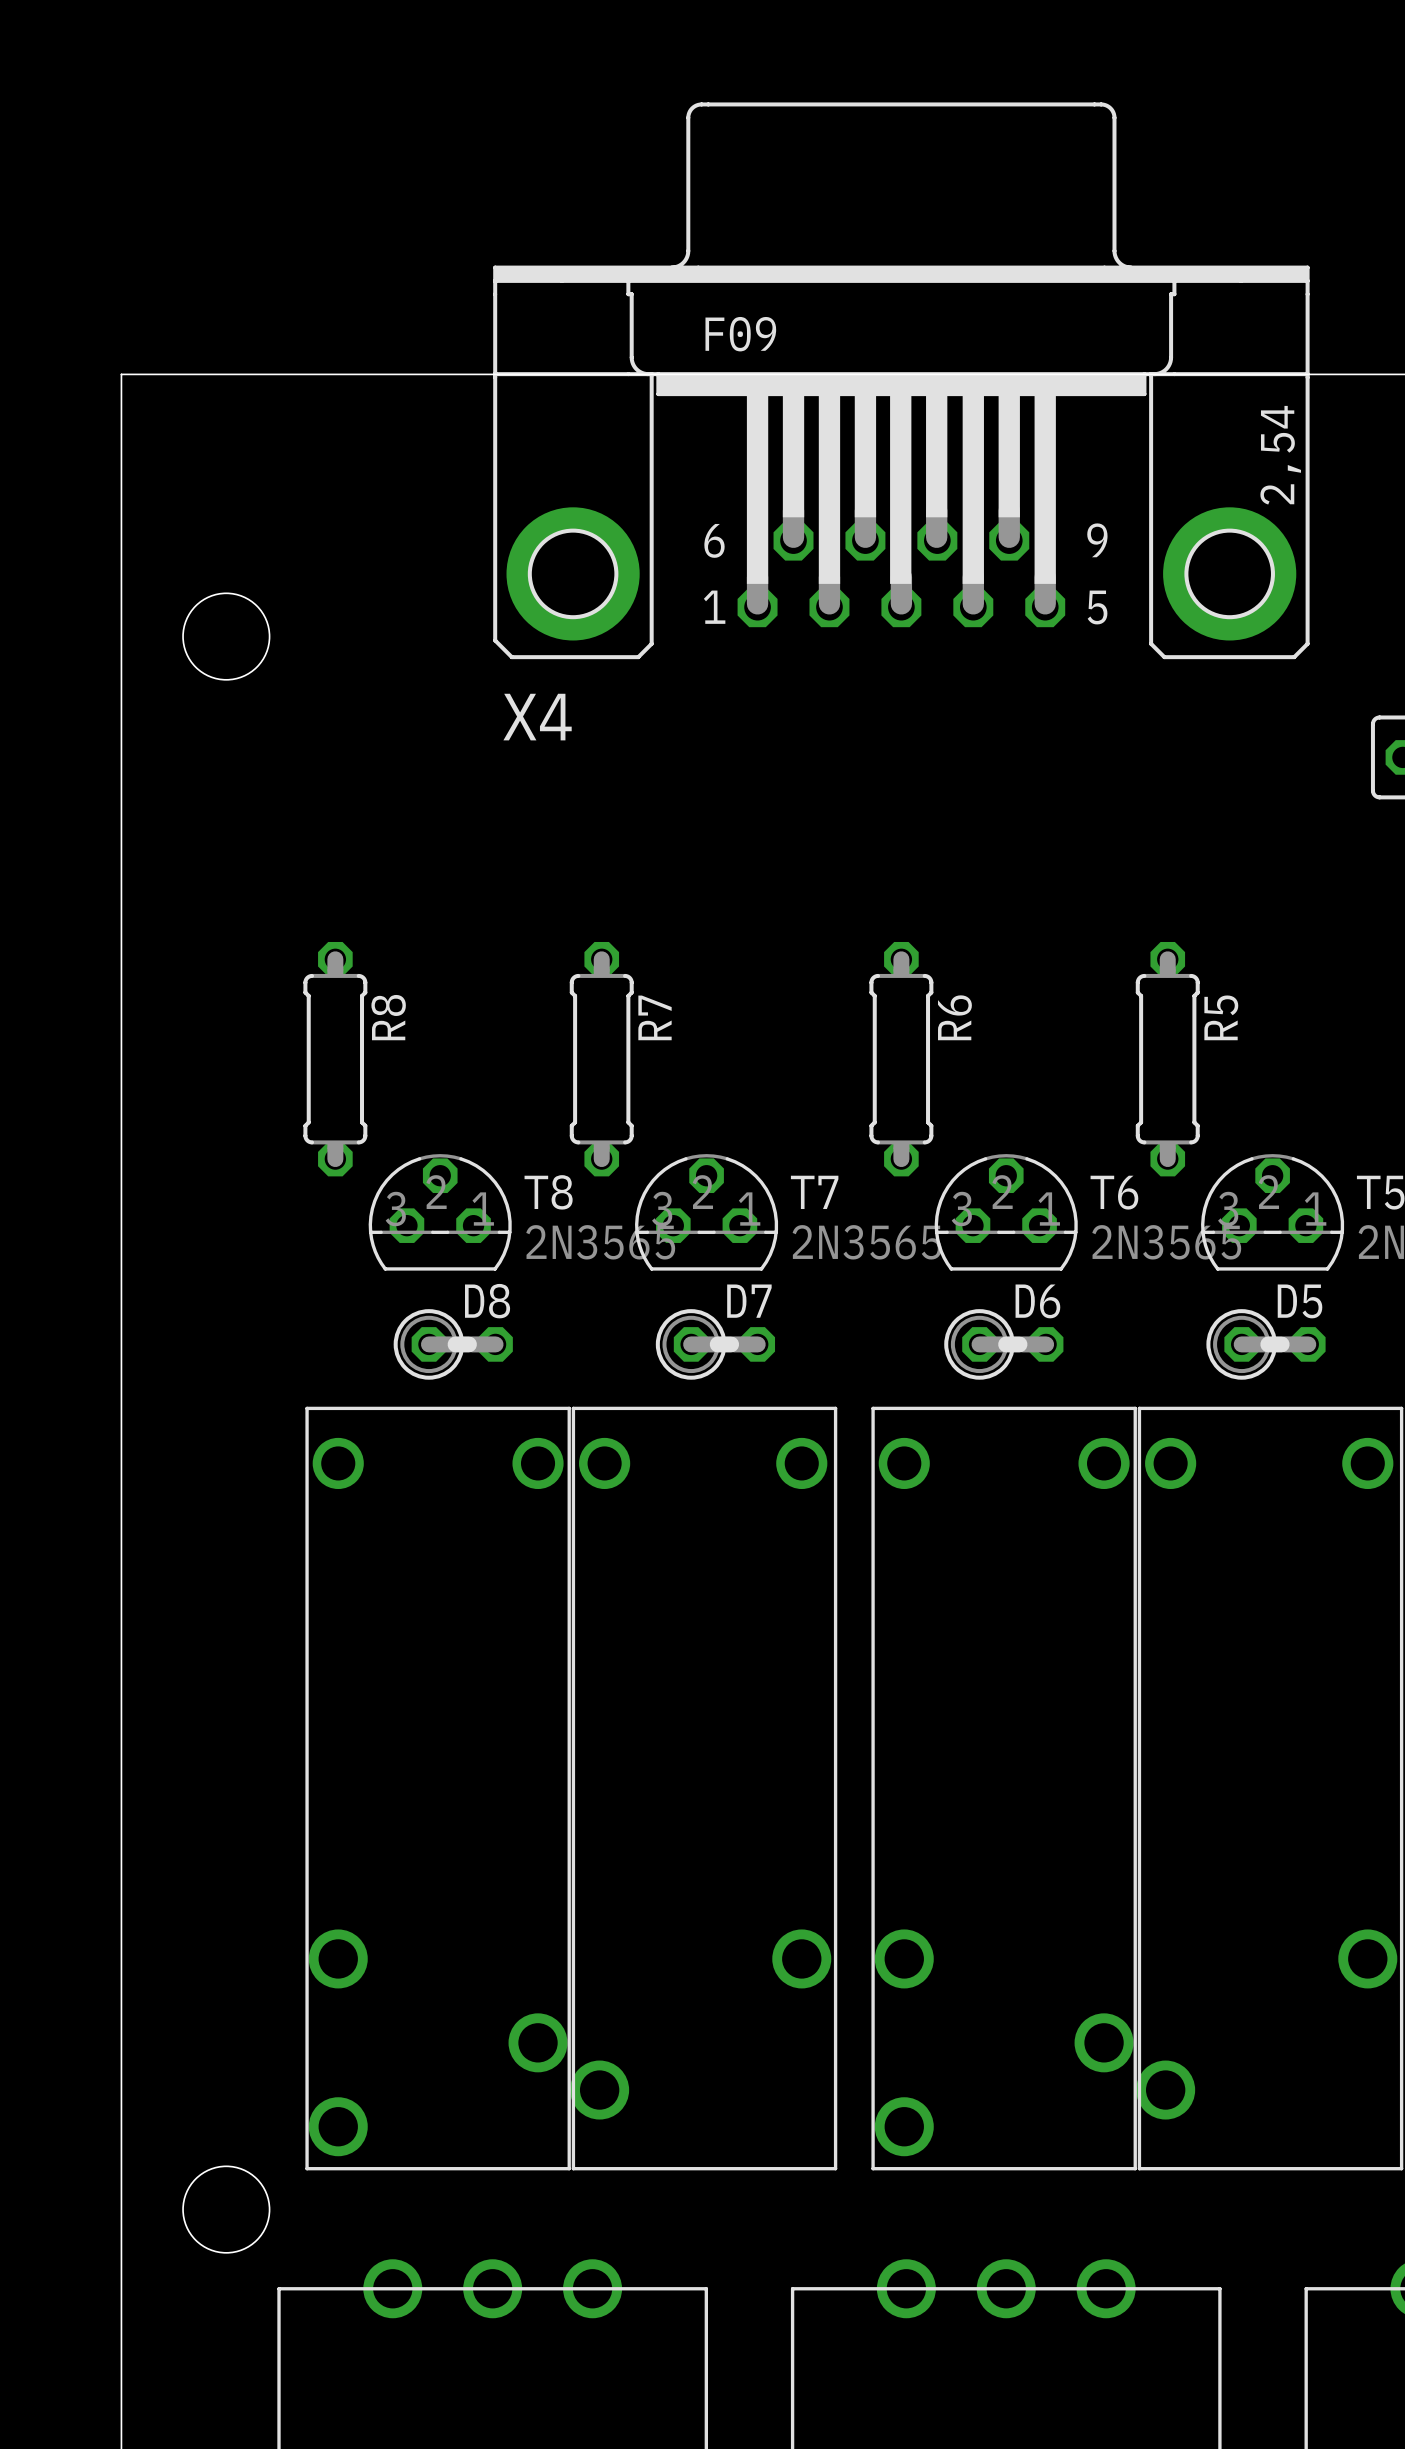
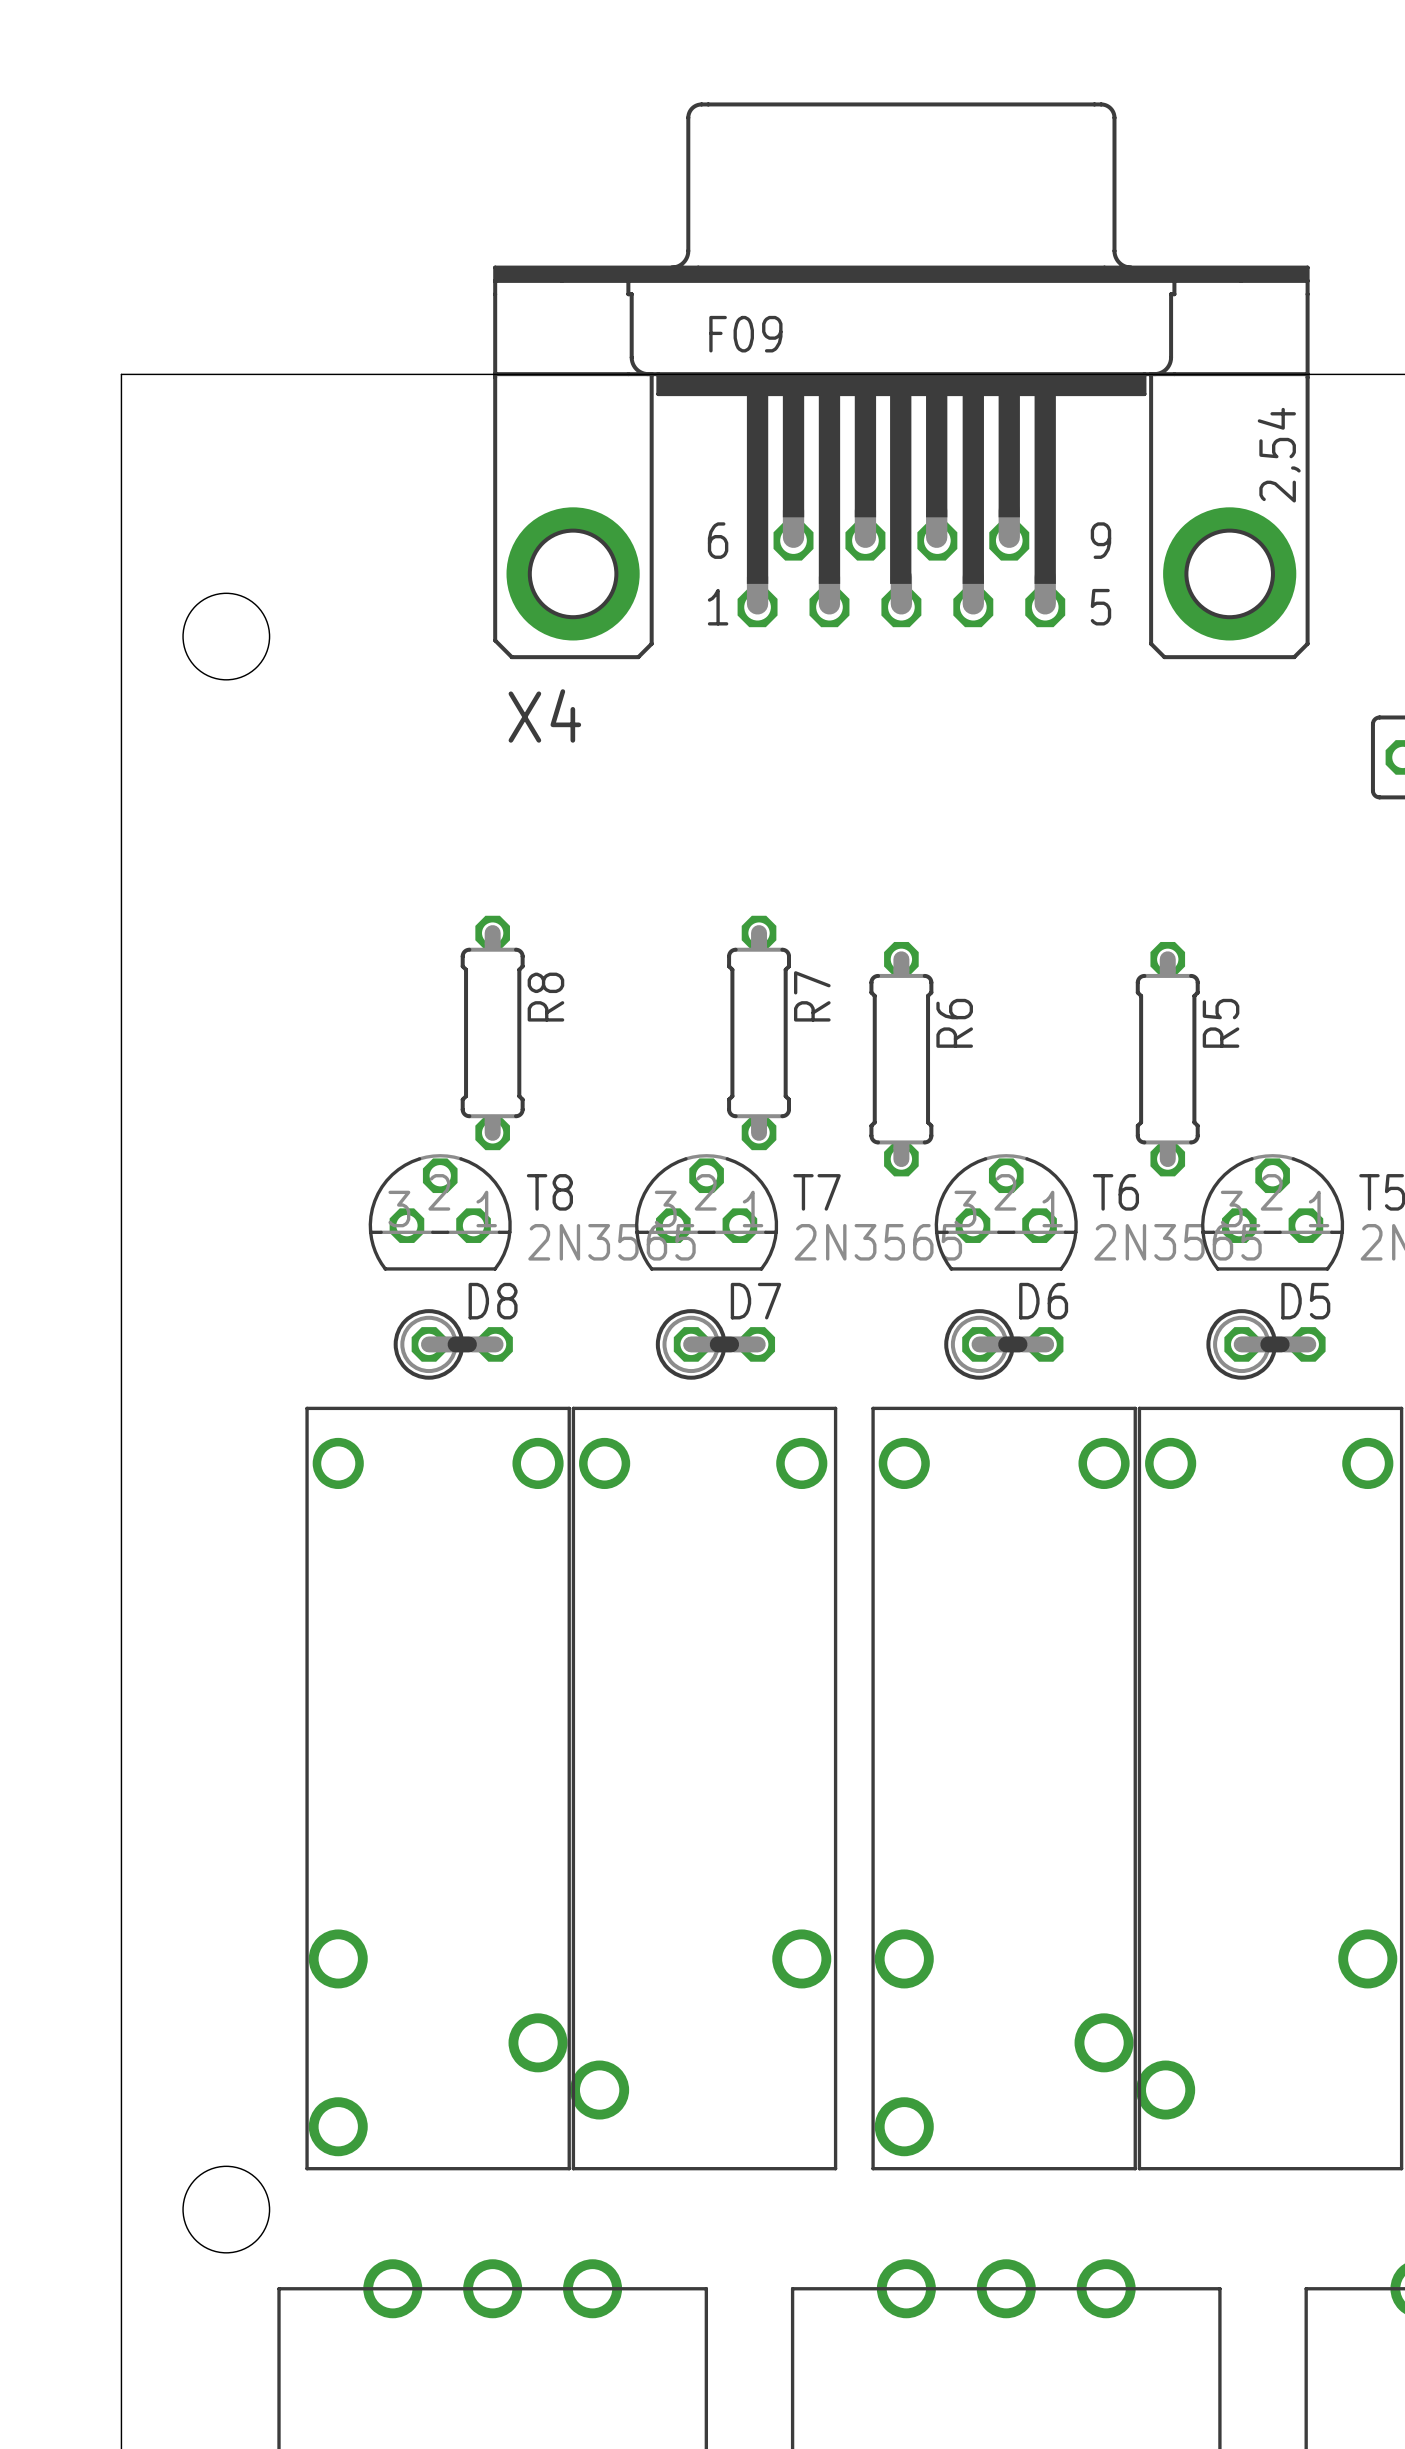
R8 position: (335, 1059) -> (492, 1032)
R7 position: (601, 1059) -> (759, 1032)

